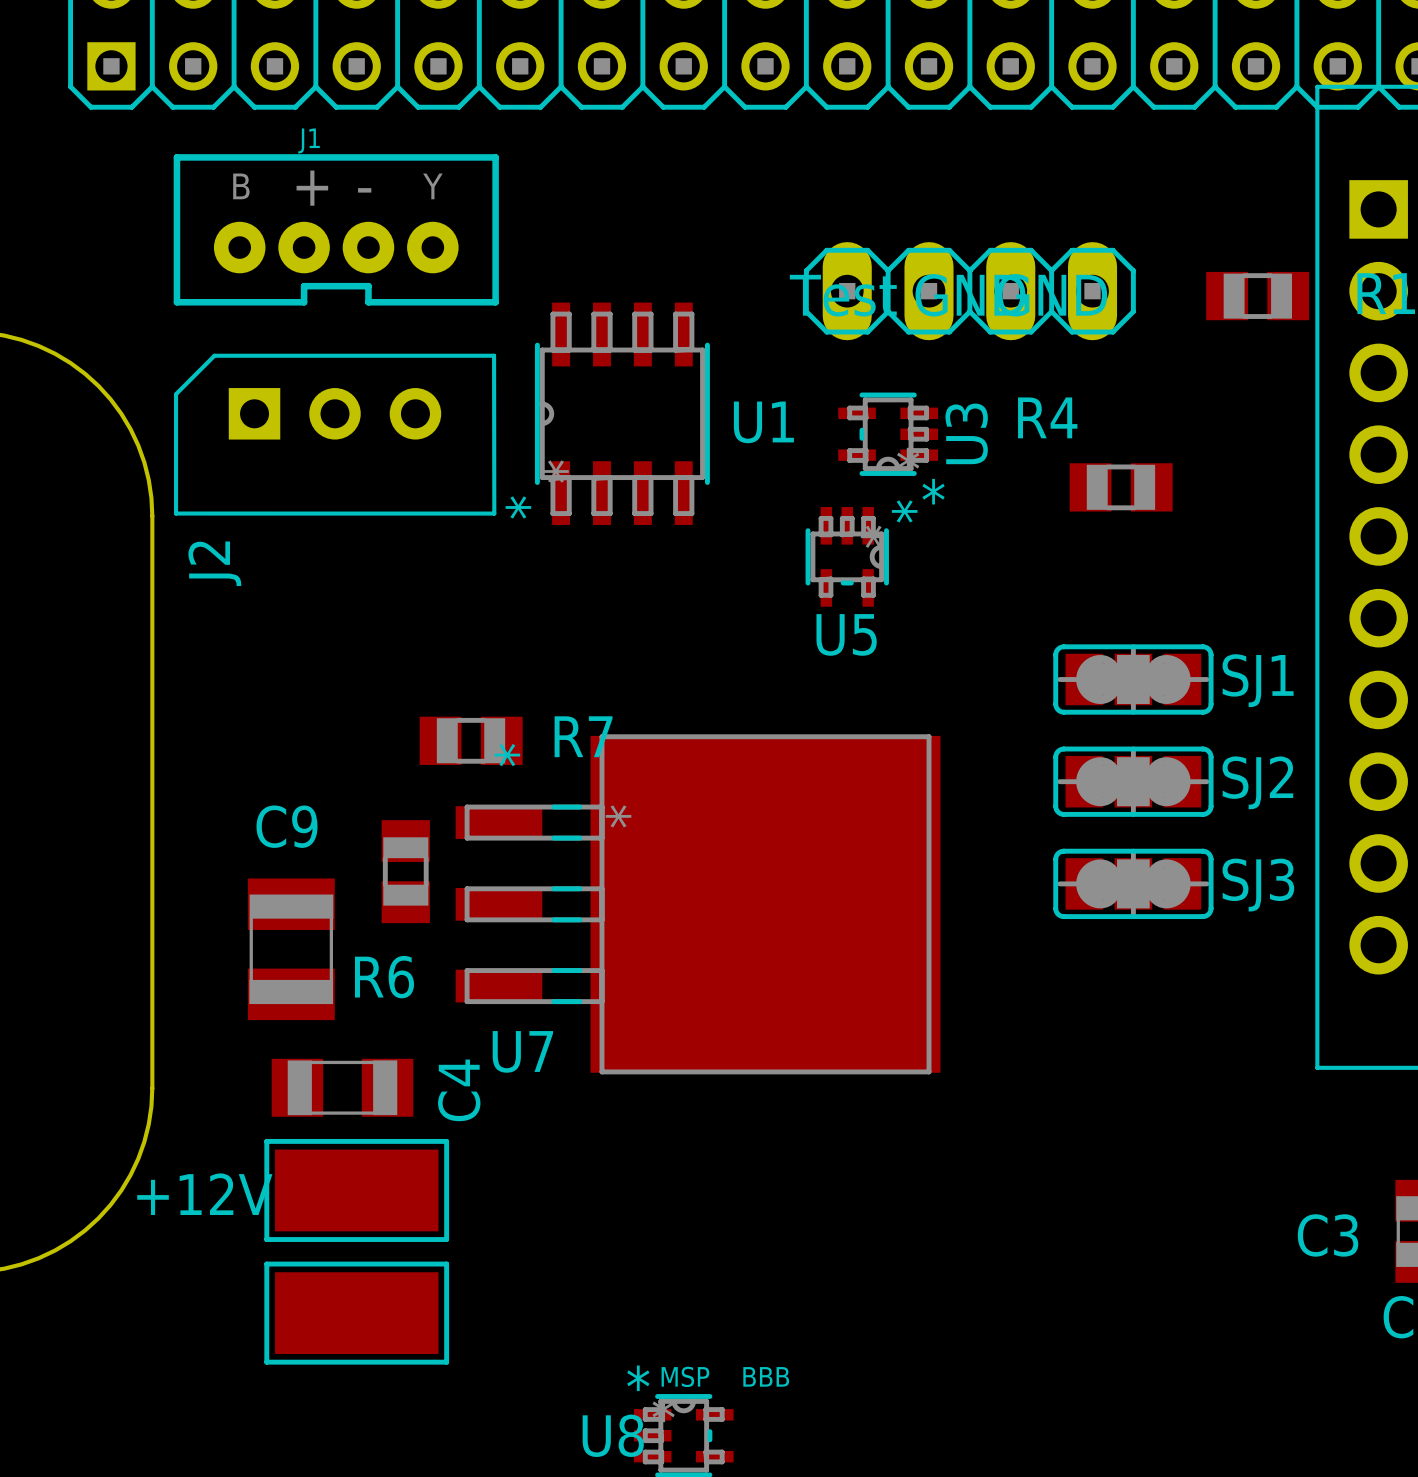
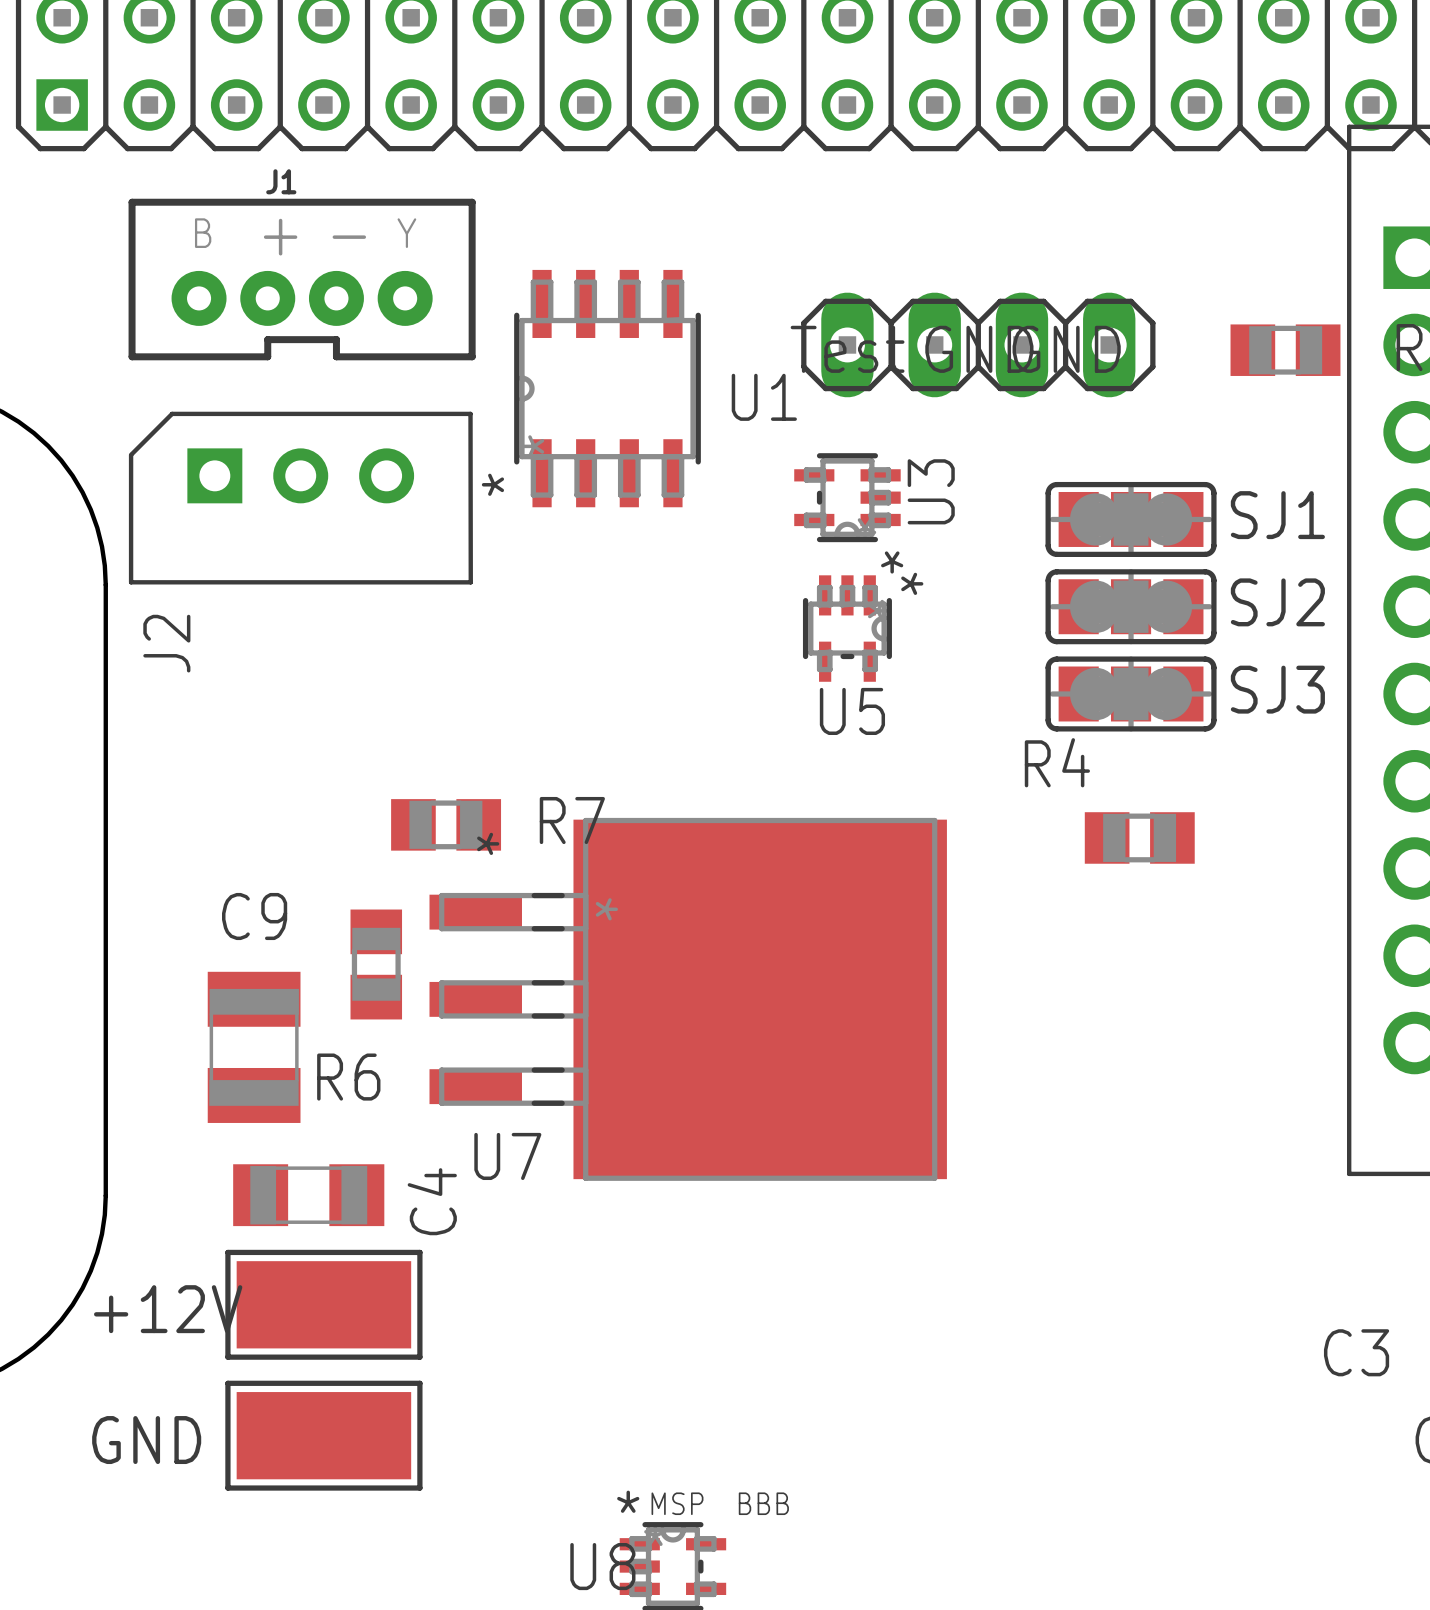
U1 position: (622, 413) -> (607, 388)
U3 position: (888, 434) -> (847, 497)
R4 position: (1121, 487) -> (1139, 837)
SJ1 position: (1133, 679) -> (1131, 519)
SJ2 position: (1133, 781) -> (1131, 606)
SJ3 position: (1133, 883) -> (1131, 693)
GND name: none -> GND (146, 1440)

